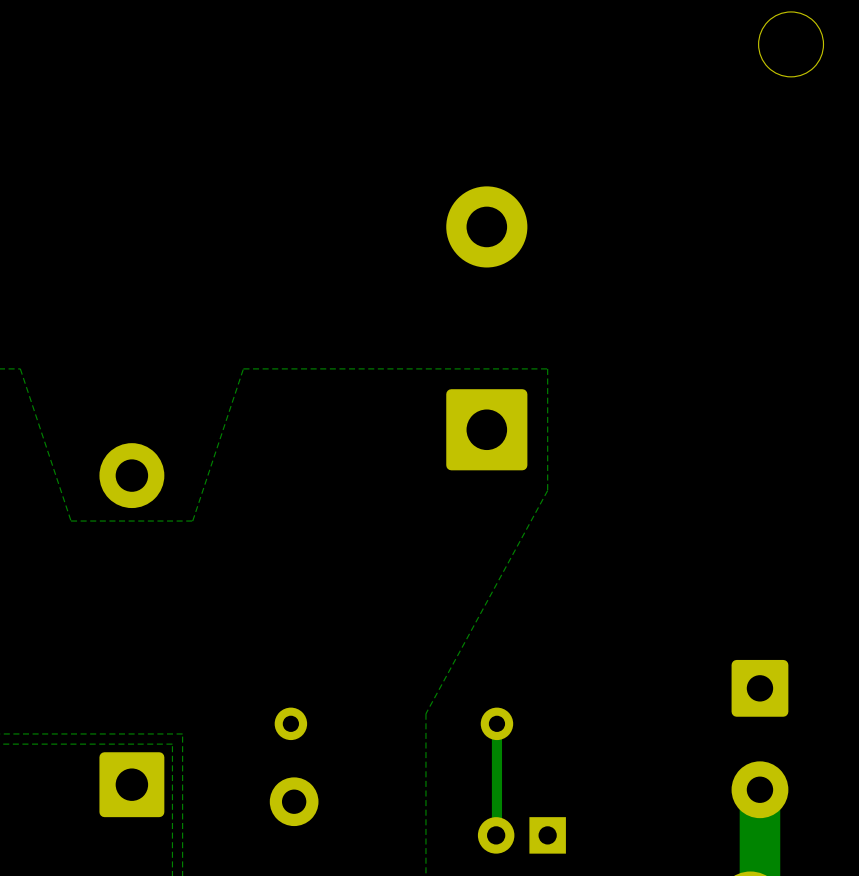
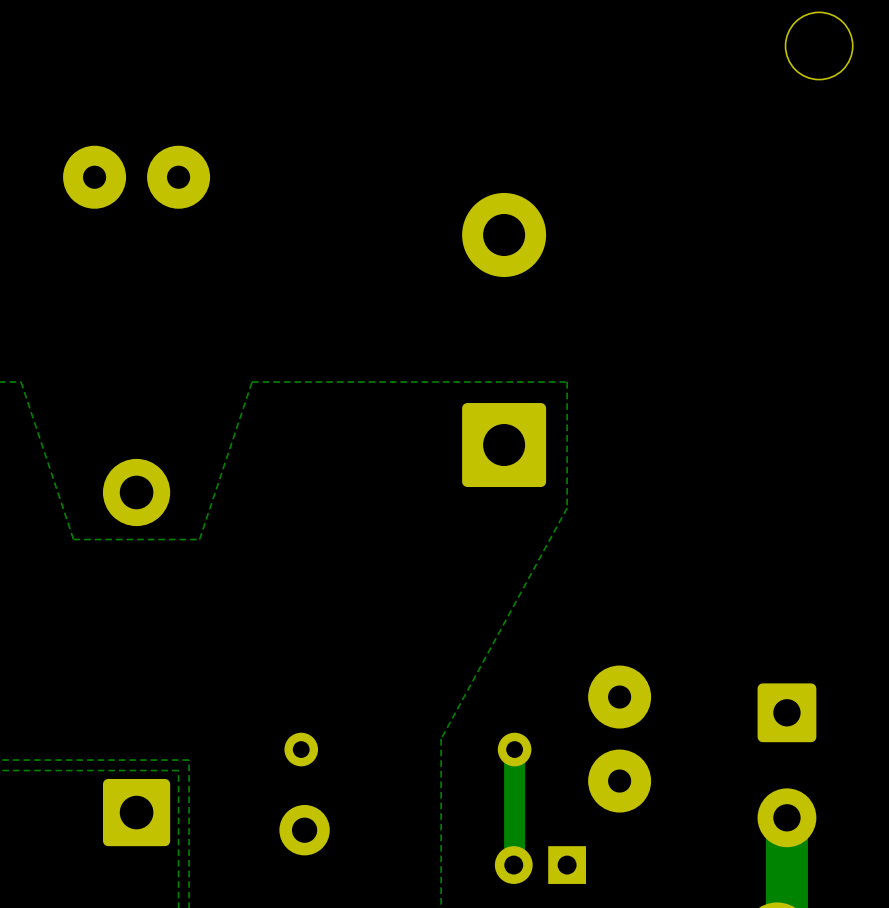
part: none -> (94, 177)
part: none -> (178, 177)
part: none -> (619, 697)
bottom track width: thin (496, 723) (496, 835) -> thick (514, 749) (513, 865)
part: none -> (619, 781)

